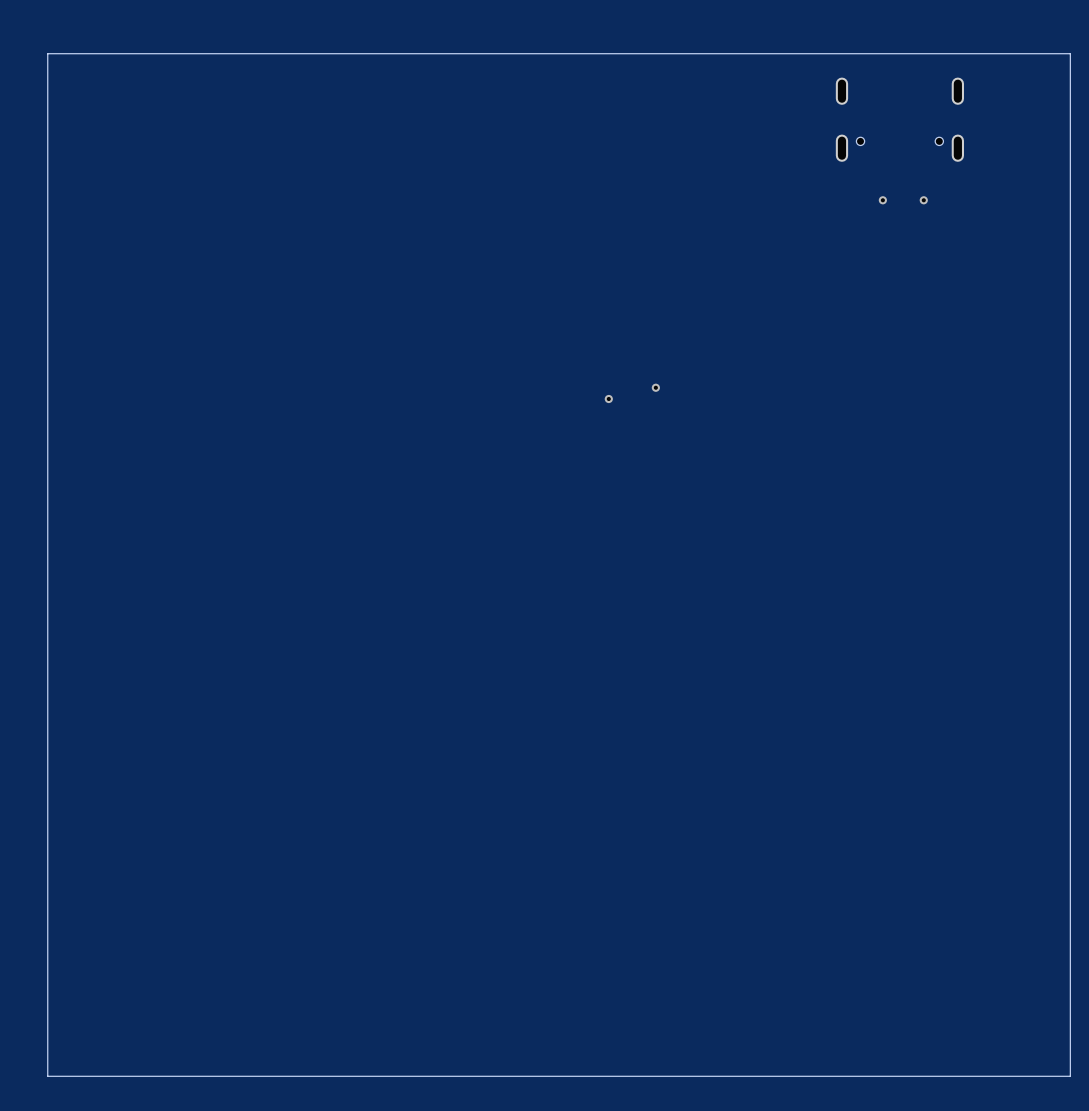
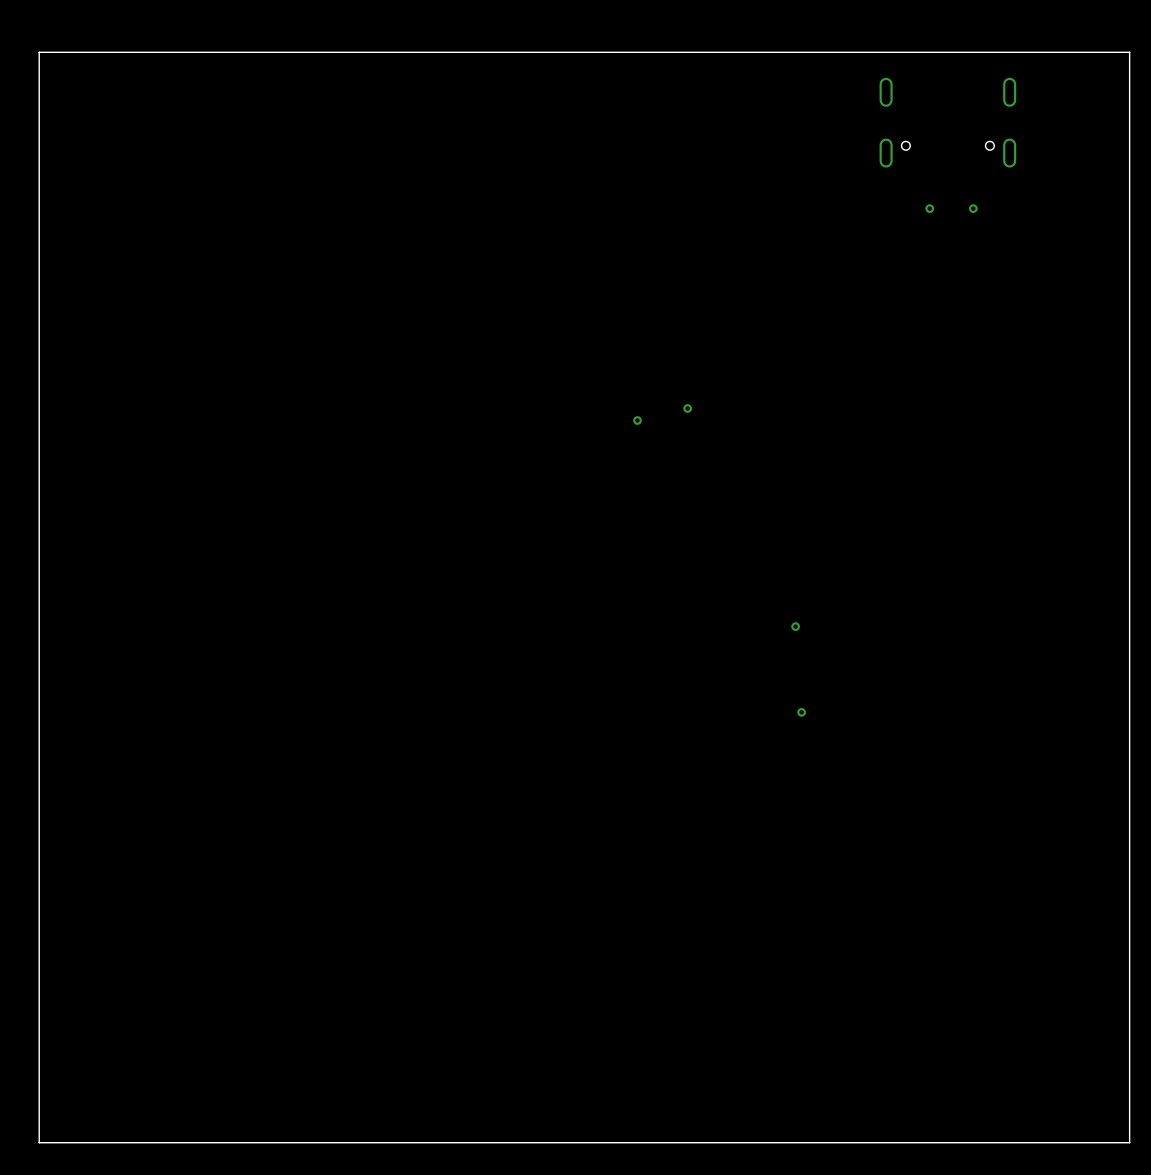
via: none -> (795, 626)
via: none -> (801, 712)

